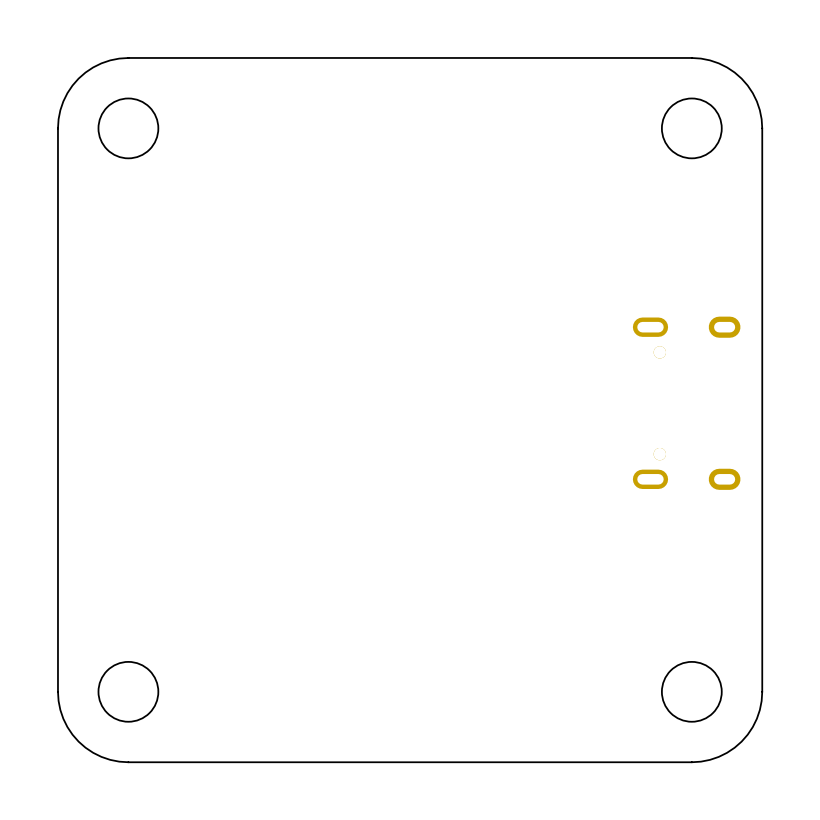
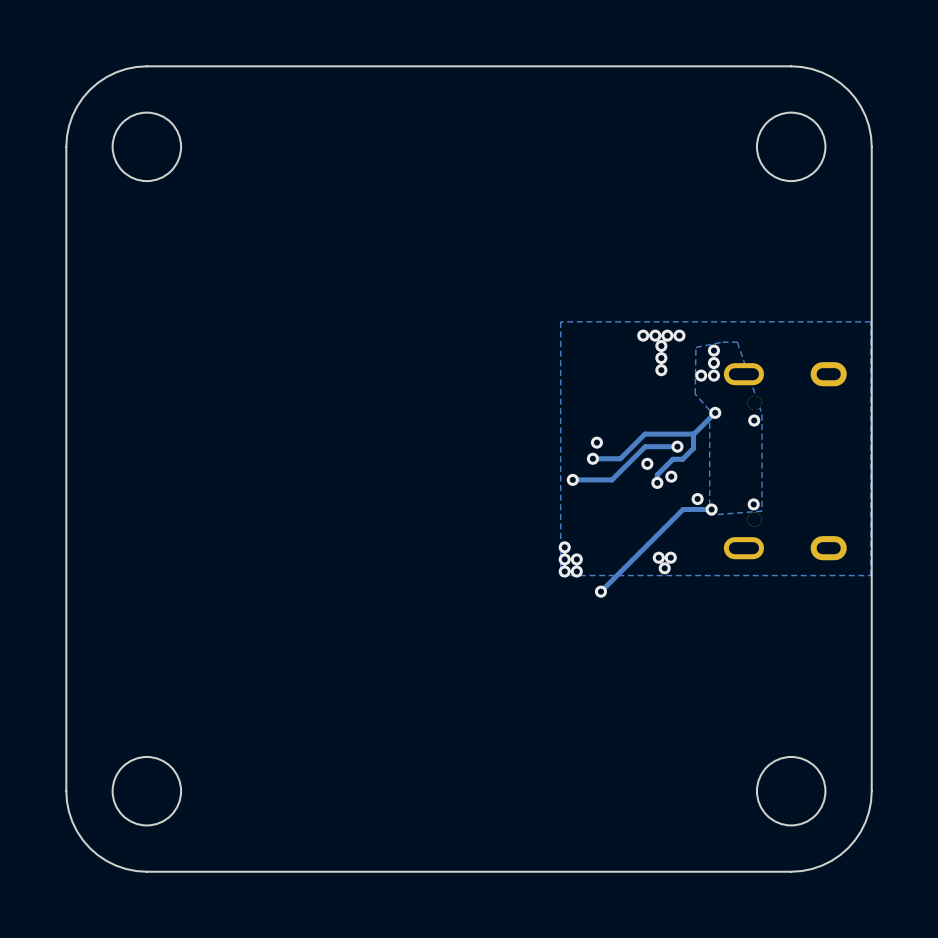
zone outline: none -> (870, 321) (560, 321) (560, 575) (870, 575) (870, 321)
via: none -> (643, 335)
via: none -> (655, 335)
via: none -> (667, 335)
via: none -> (679, 335)
zone outline: none -> (737, 342) (722, 342) (695, 347) (695, 394) (709, 410) (709, 515) (762, 511) (762, 414) (737, 342)
via: none -> (661, 346)
via: none -> (713, 350)
via: none -> (661, 358)
via: none -> (713, 363)
via: none -> (661, 370)
via: none -> (701, 375)
via: none -> (713, 375)
track: none -> (715, 412) (693, 434)
via: none -> (715, 412)
via: none -> (754, 420)
track: none -> (693, 434) (693, 448) (682, 459) (672, 459) (657, 474) (657, 482)
track: none -> (693, 434) (645, 434) (620, 458) (592, 458)
via: none -> (596, 442)
track: none -> (677, 446) (645, 446) (612, 479) (572, 479)
via: none -> (677, 446)
via: none -> (592, 458)
via: none -> (647, 463)
via: none -> (671, 476)
via: none -> (572, 479)
via: none -> (657, 482)
via: none -> (697, 499)
via: none -> (753, 504)
track: none -> (711, 509) (683, 509) (600, 591)
via: none -> (711, 509)
via: none -> (564, 547)
via: none -> (658, 557)
via: none -> (670, 557)
via: none -> (564, 559)
via: none -> (576, 559)
via: none -> (664, 568)
via: none -> (564, 571)
via: none -> (576, 571)
via: none -> (600, 591)

